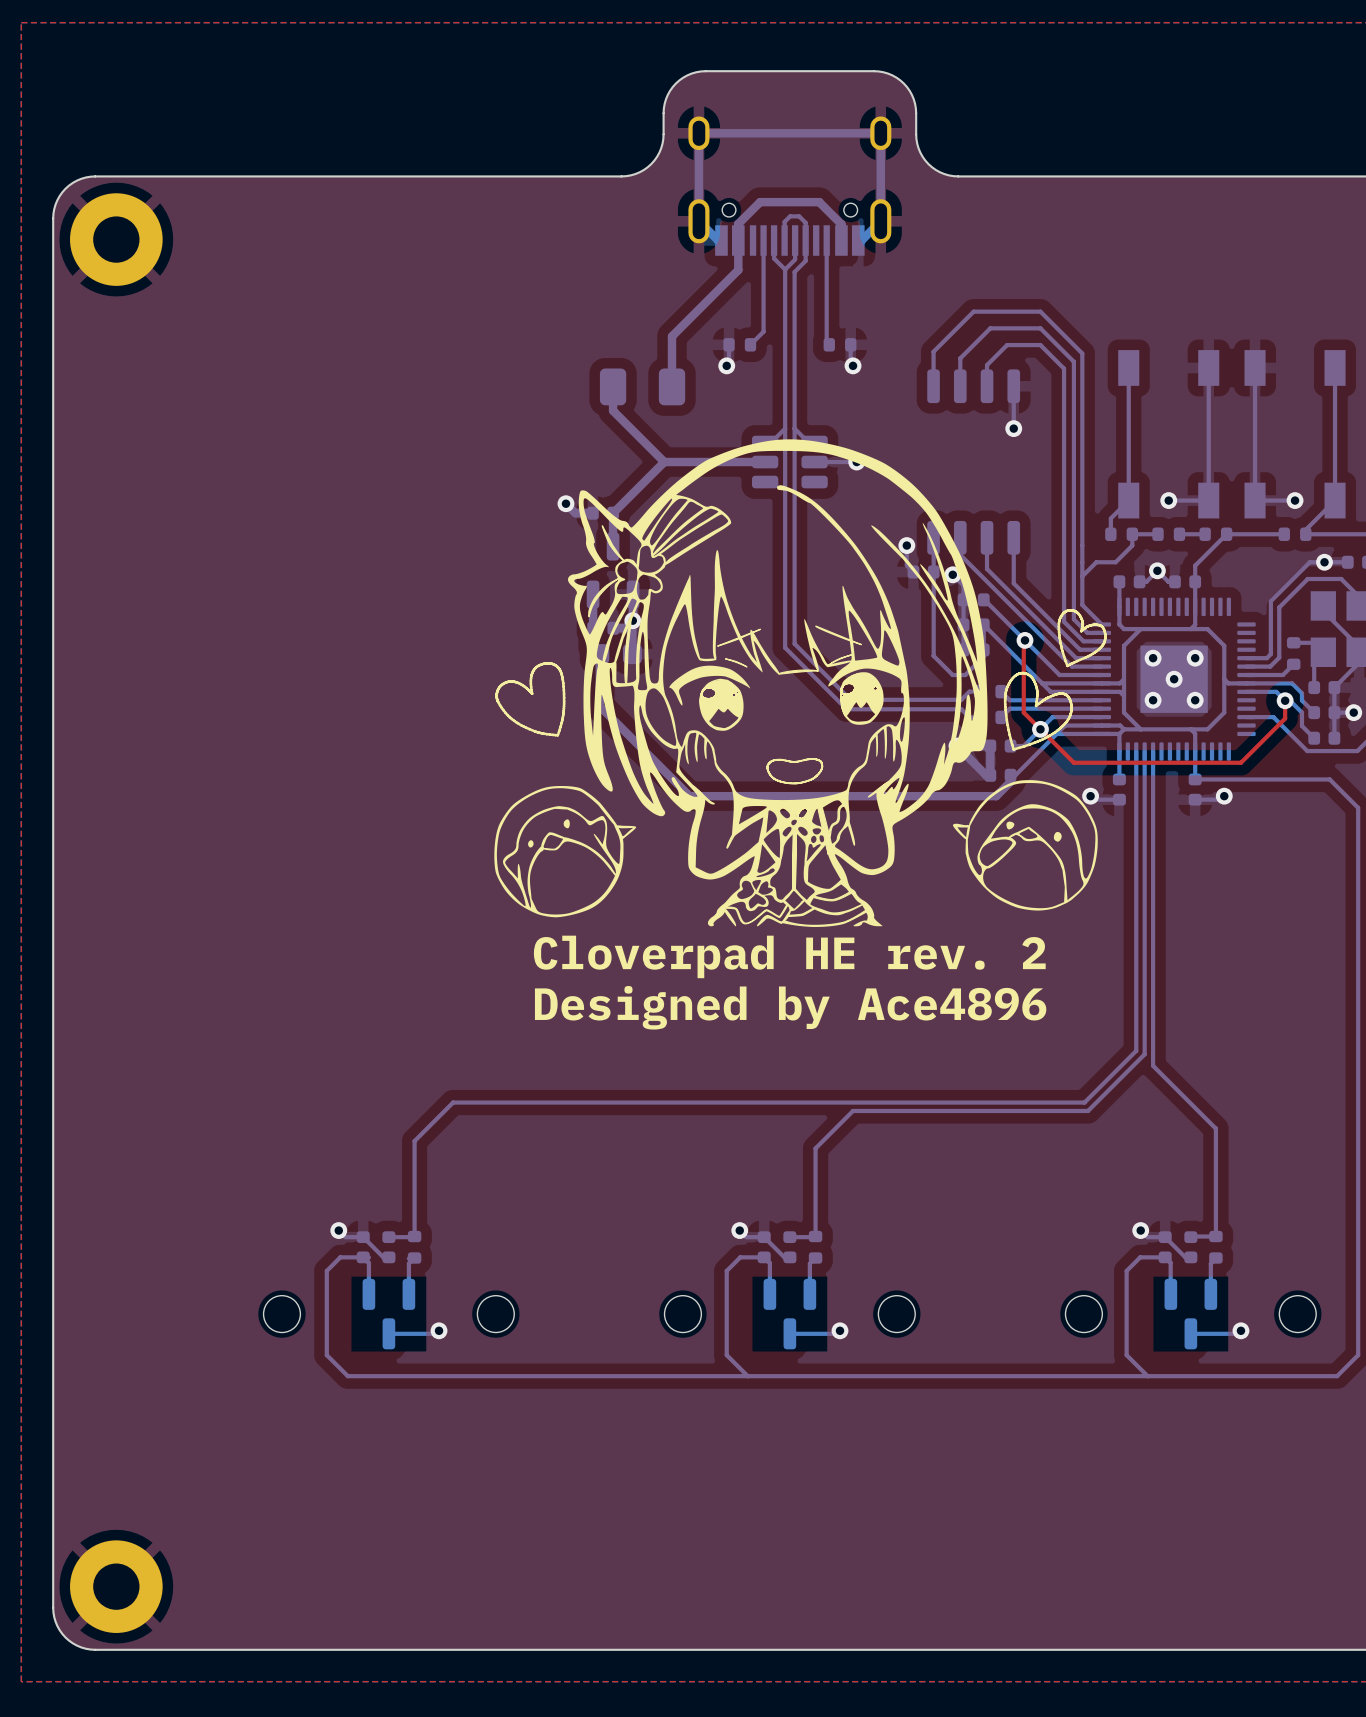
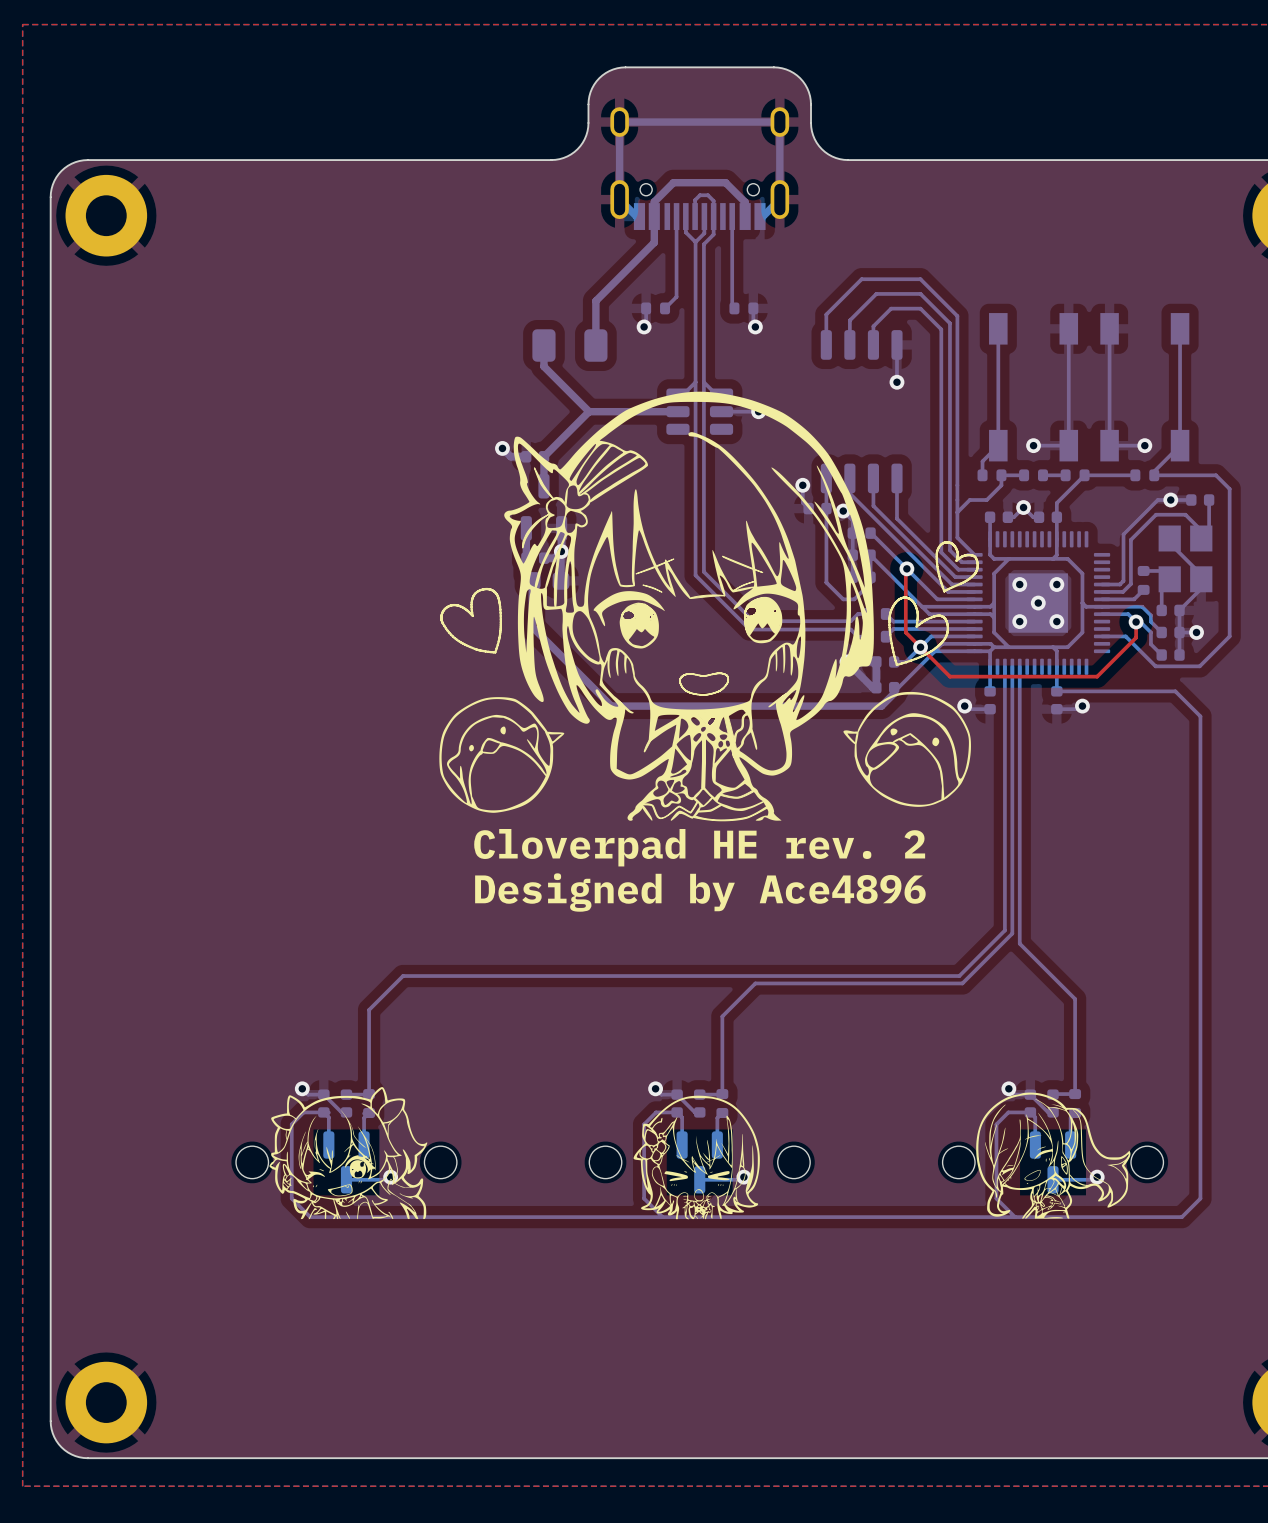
drawing: none -> [269, 1087, 428, 1220]
drawing: none -> [976, 1092, 1131, 1219]
drawing: none -> [633, 1095, 760, 1220]

